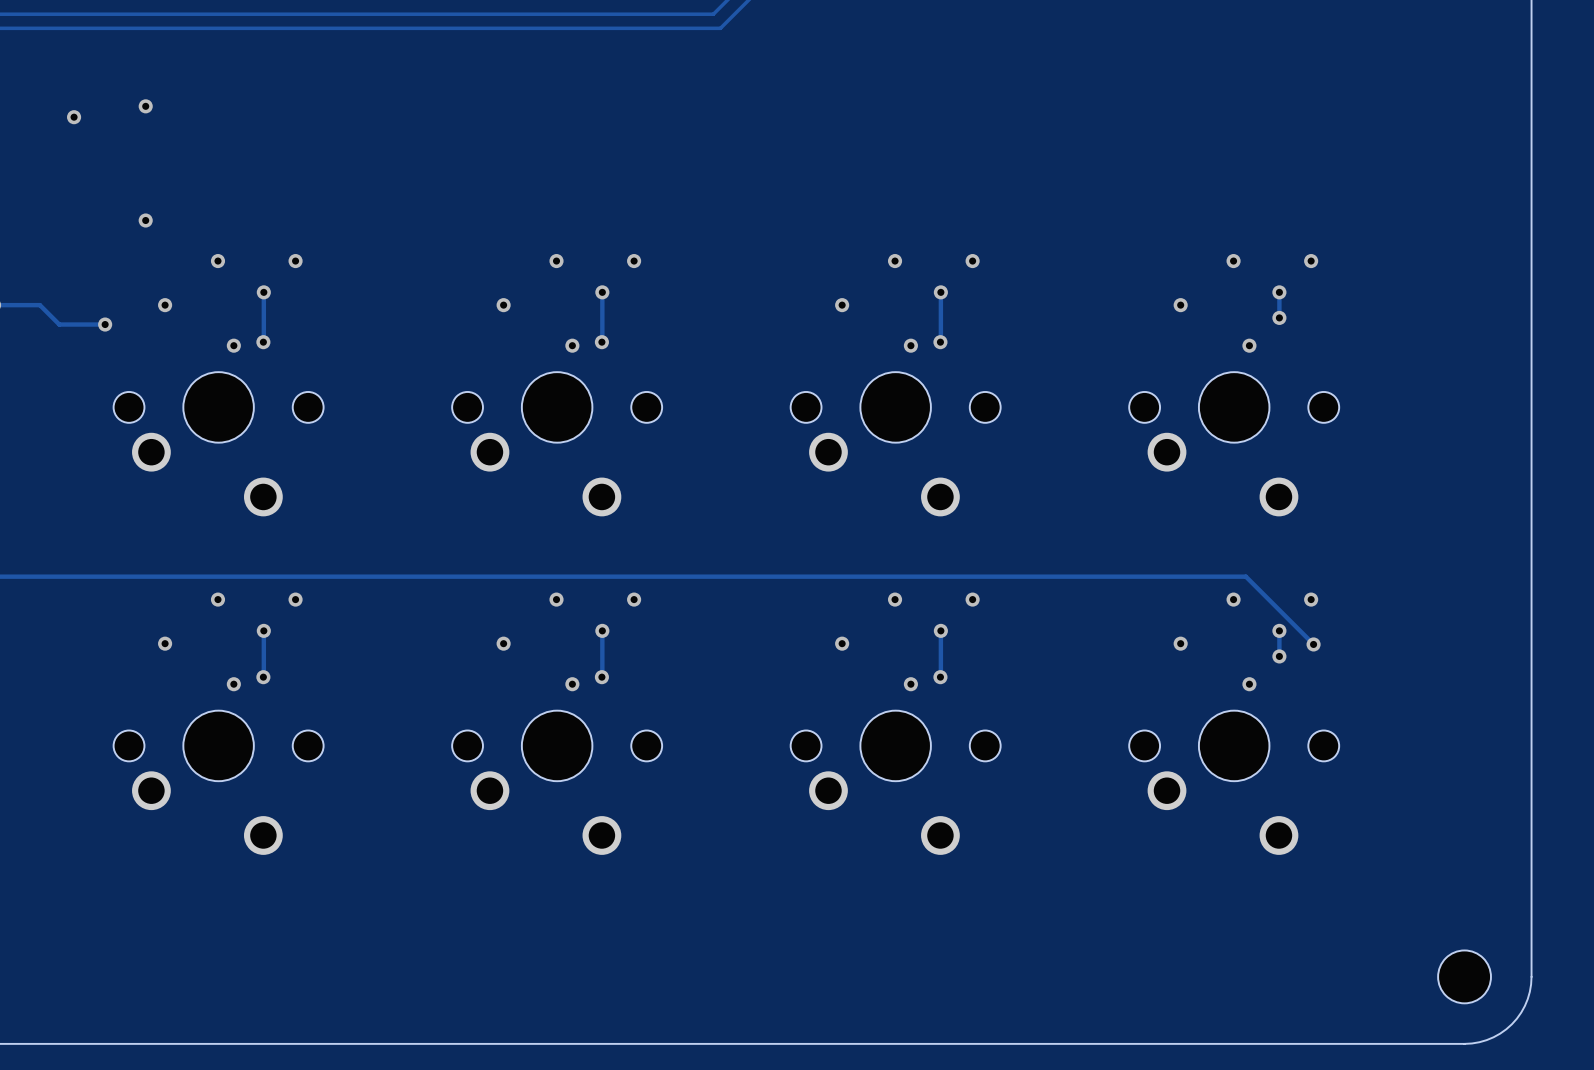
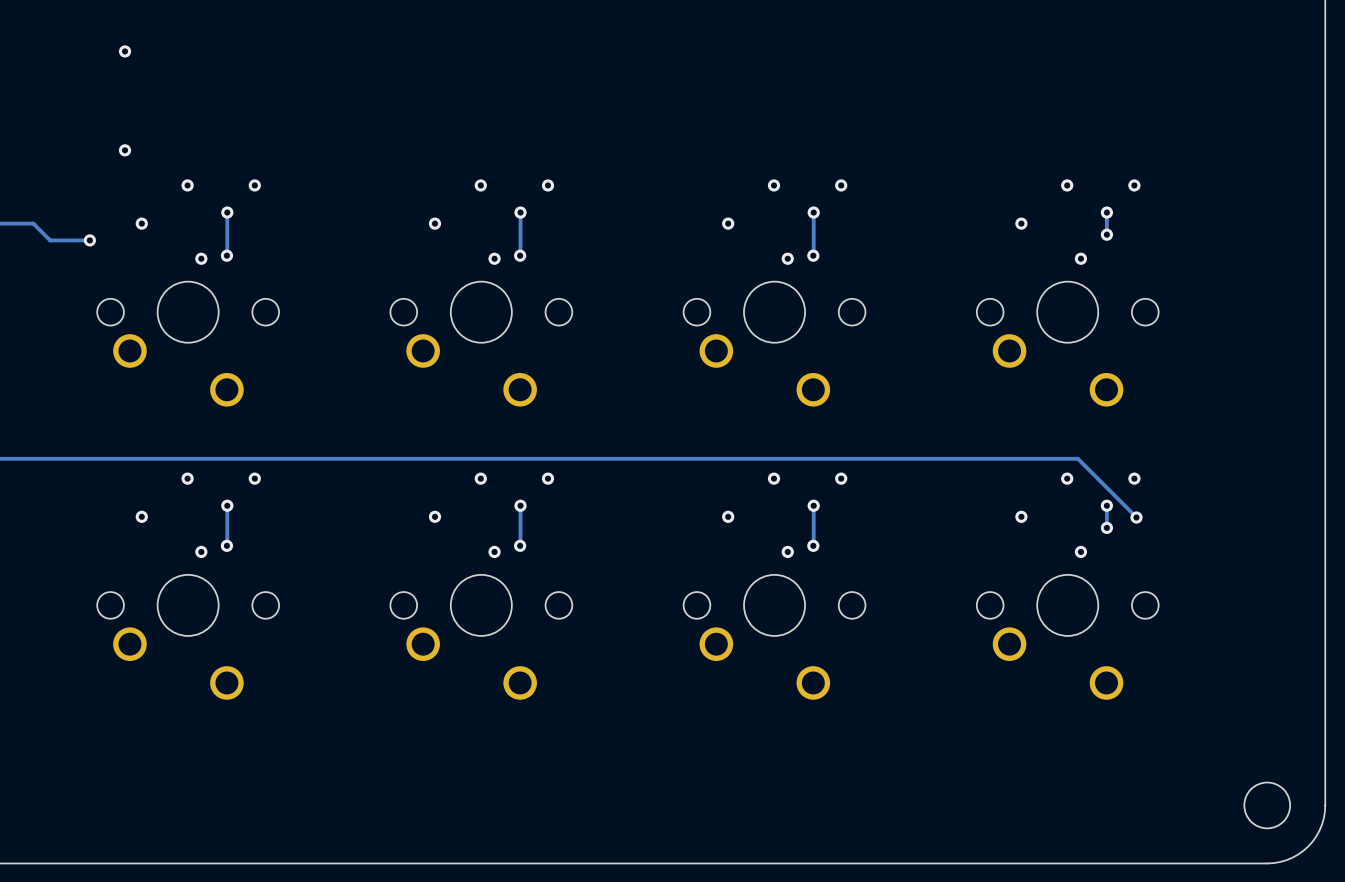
via: (74, 117) -> none

